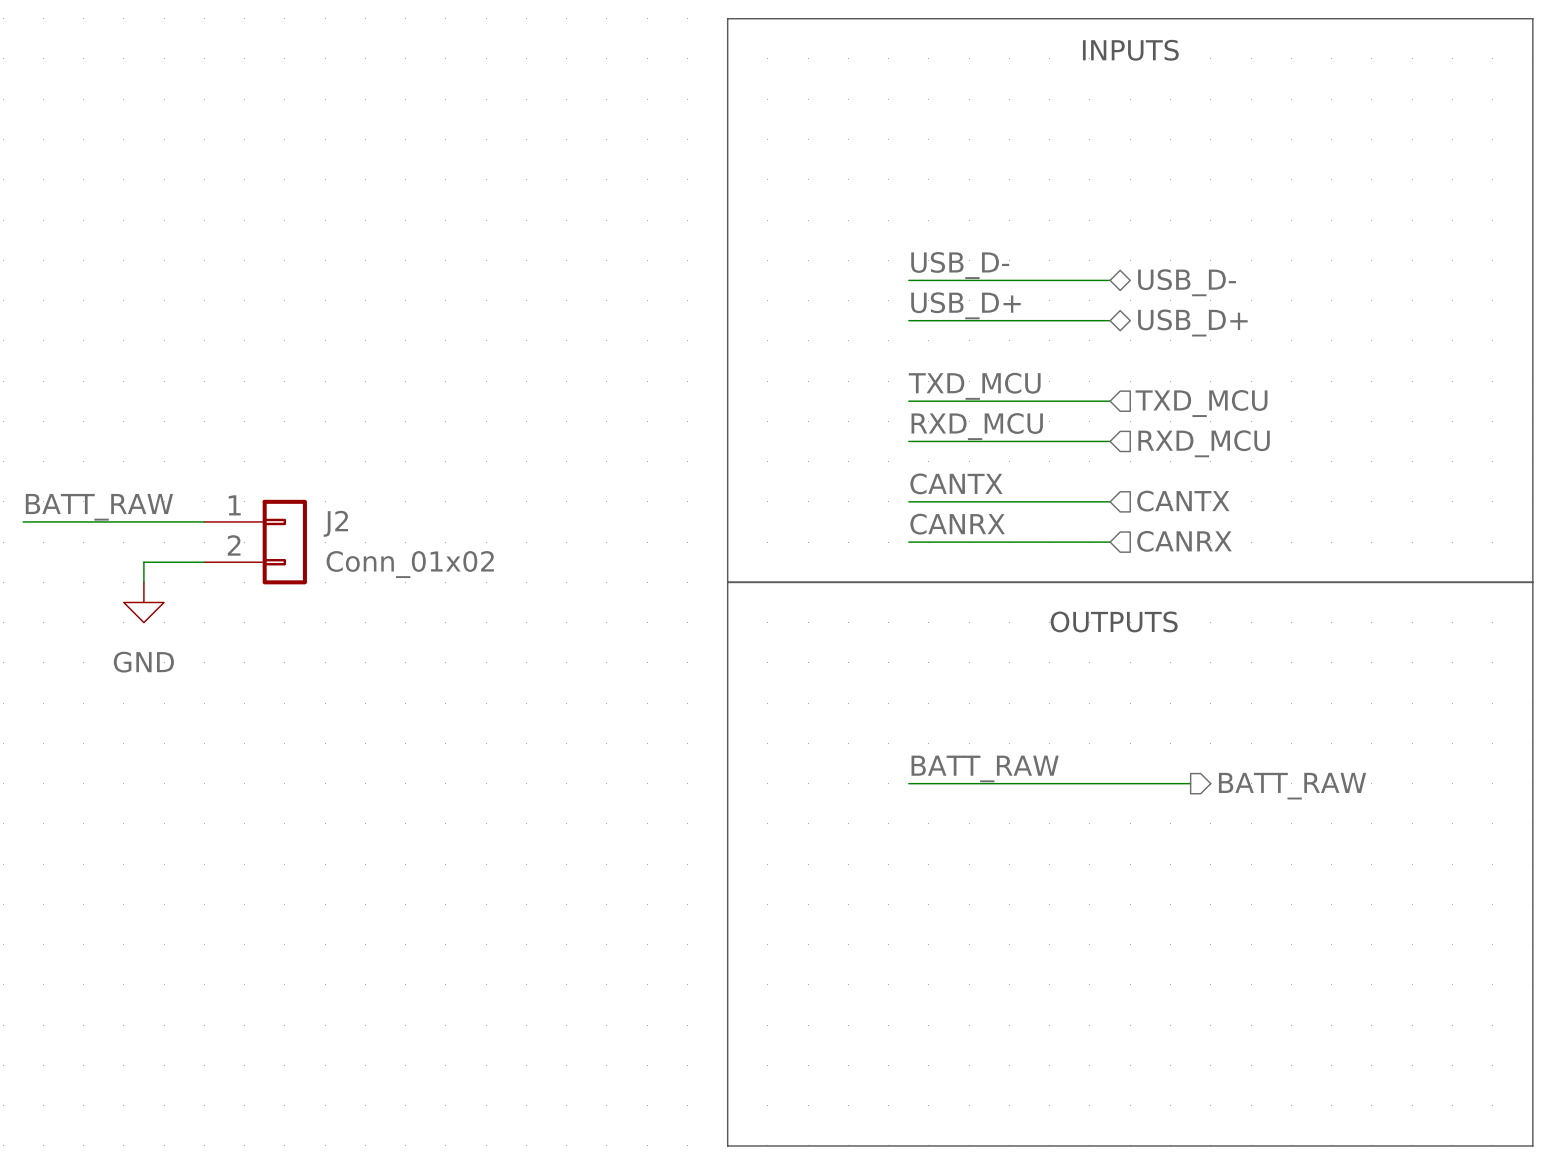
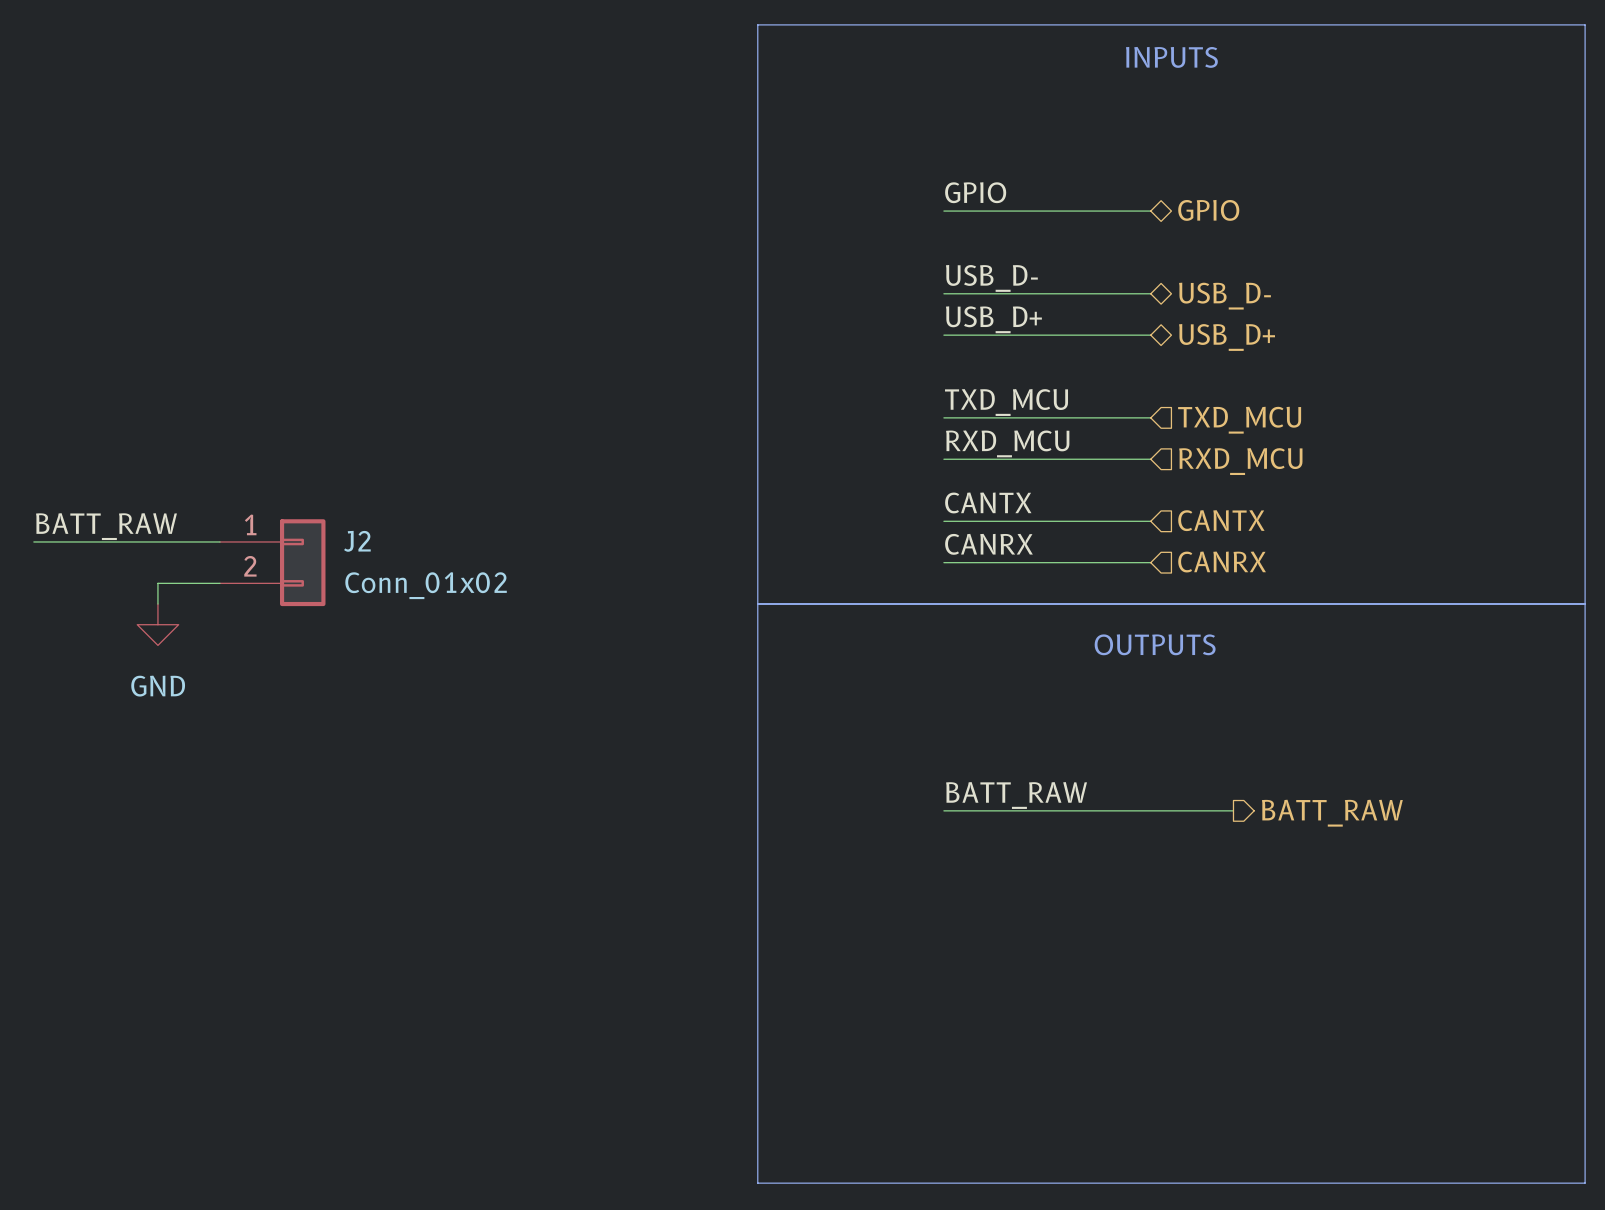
label: none -> GPIO (975, 192)
wire: none -> (943, 211) (1150, 211)
hierarchical label: none -> GPIO (1208, 210)

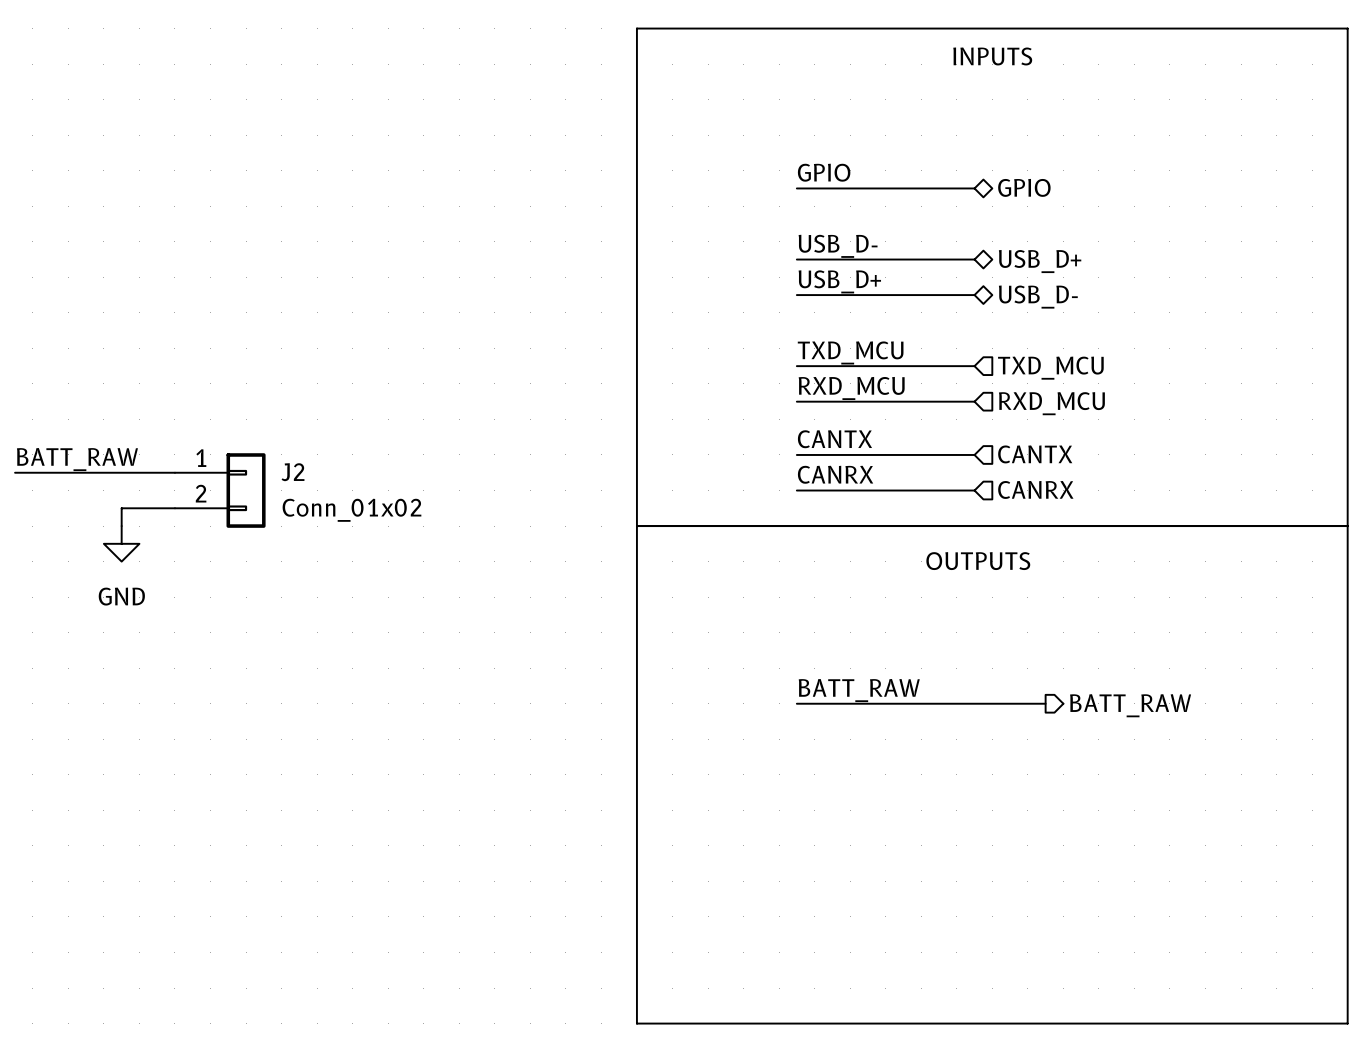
hierarchical label: USB_D- (1224, 296) -> USB_D+ (1040, 261)
hierarchical label: USB_D+ (1227, 337) -> USB_D- (1038, 297)

